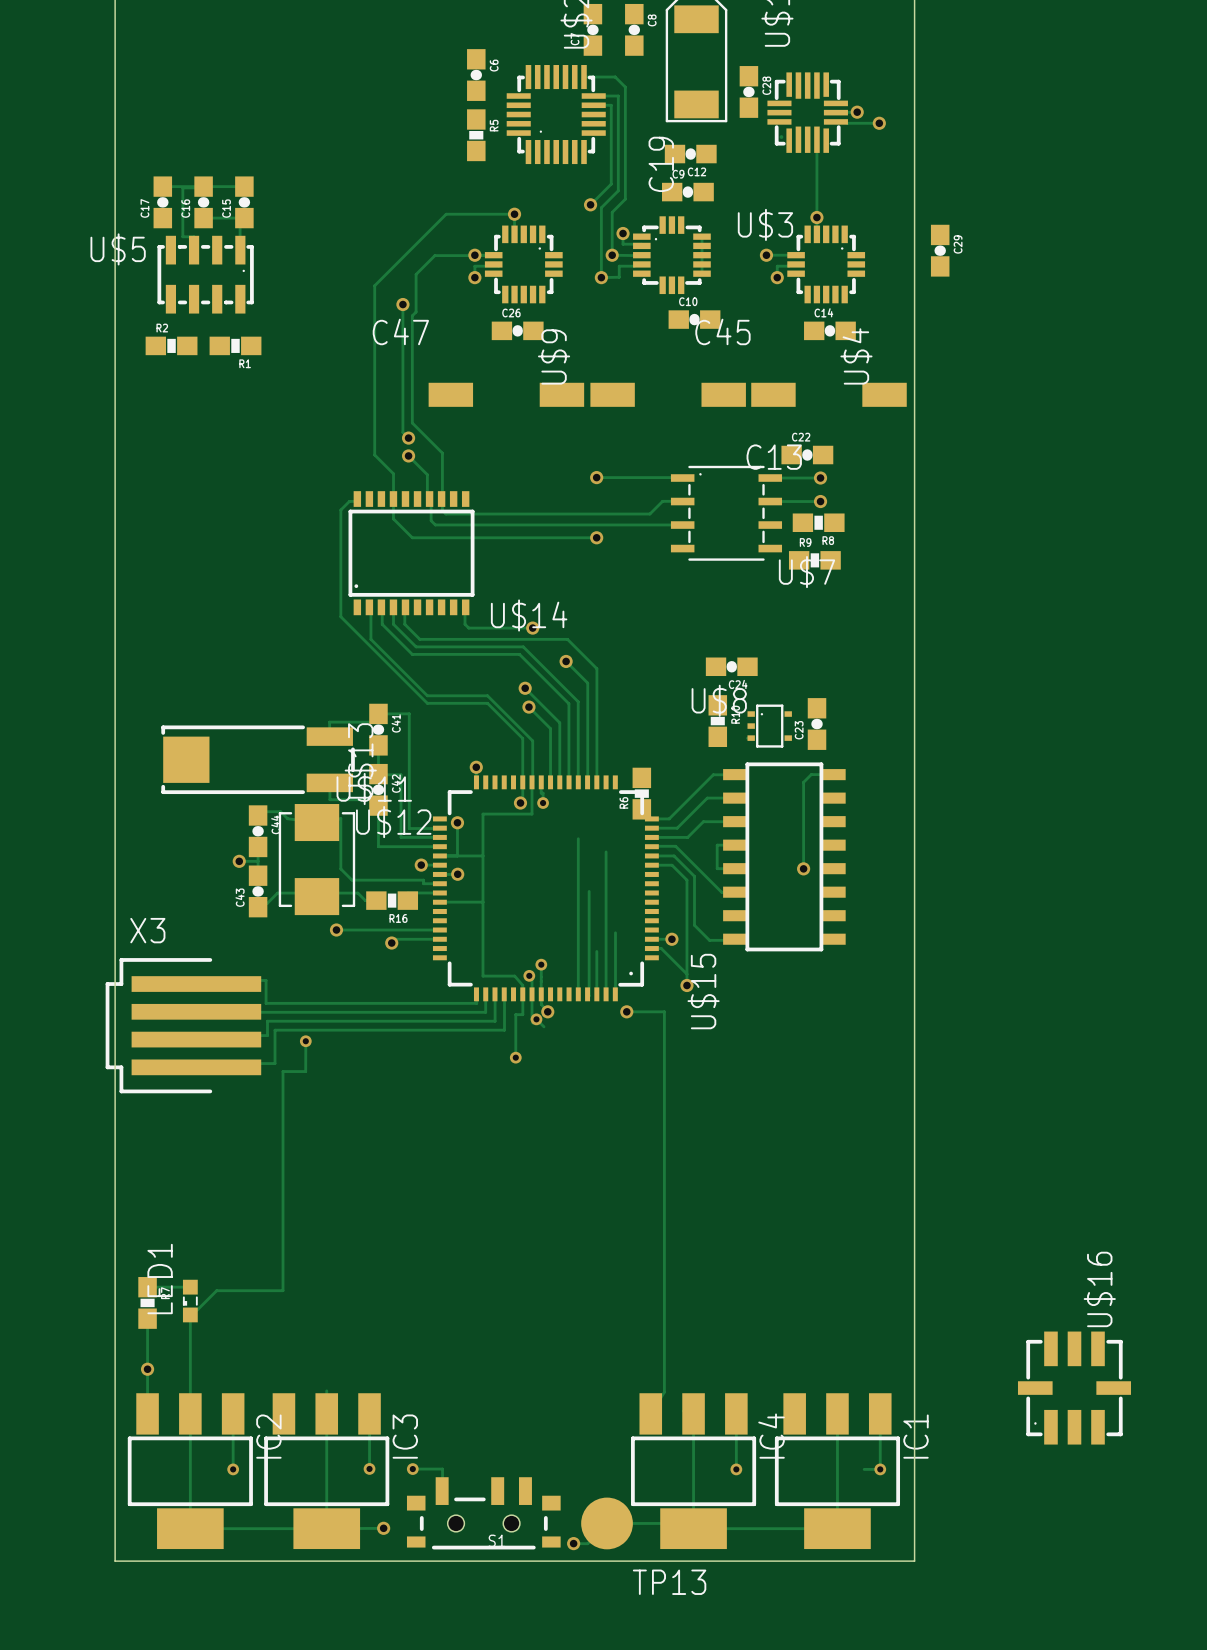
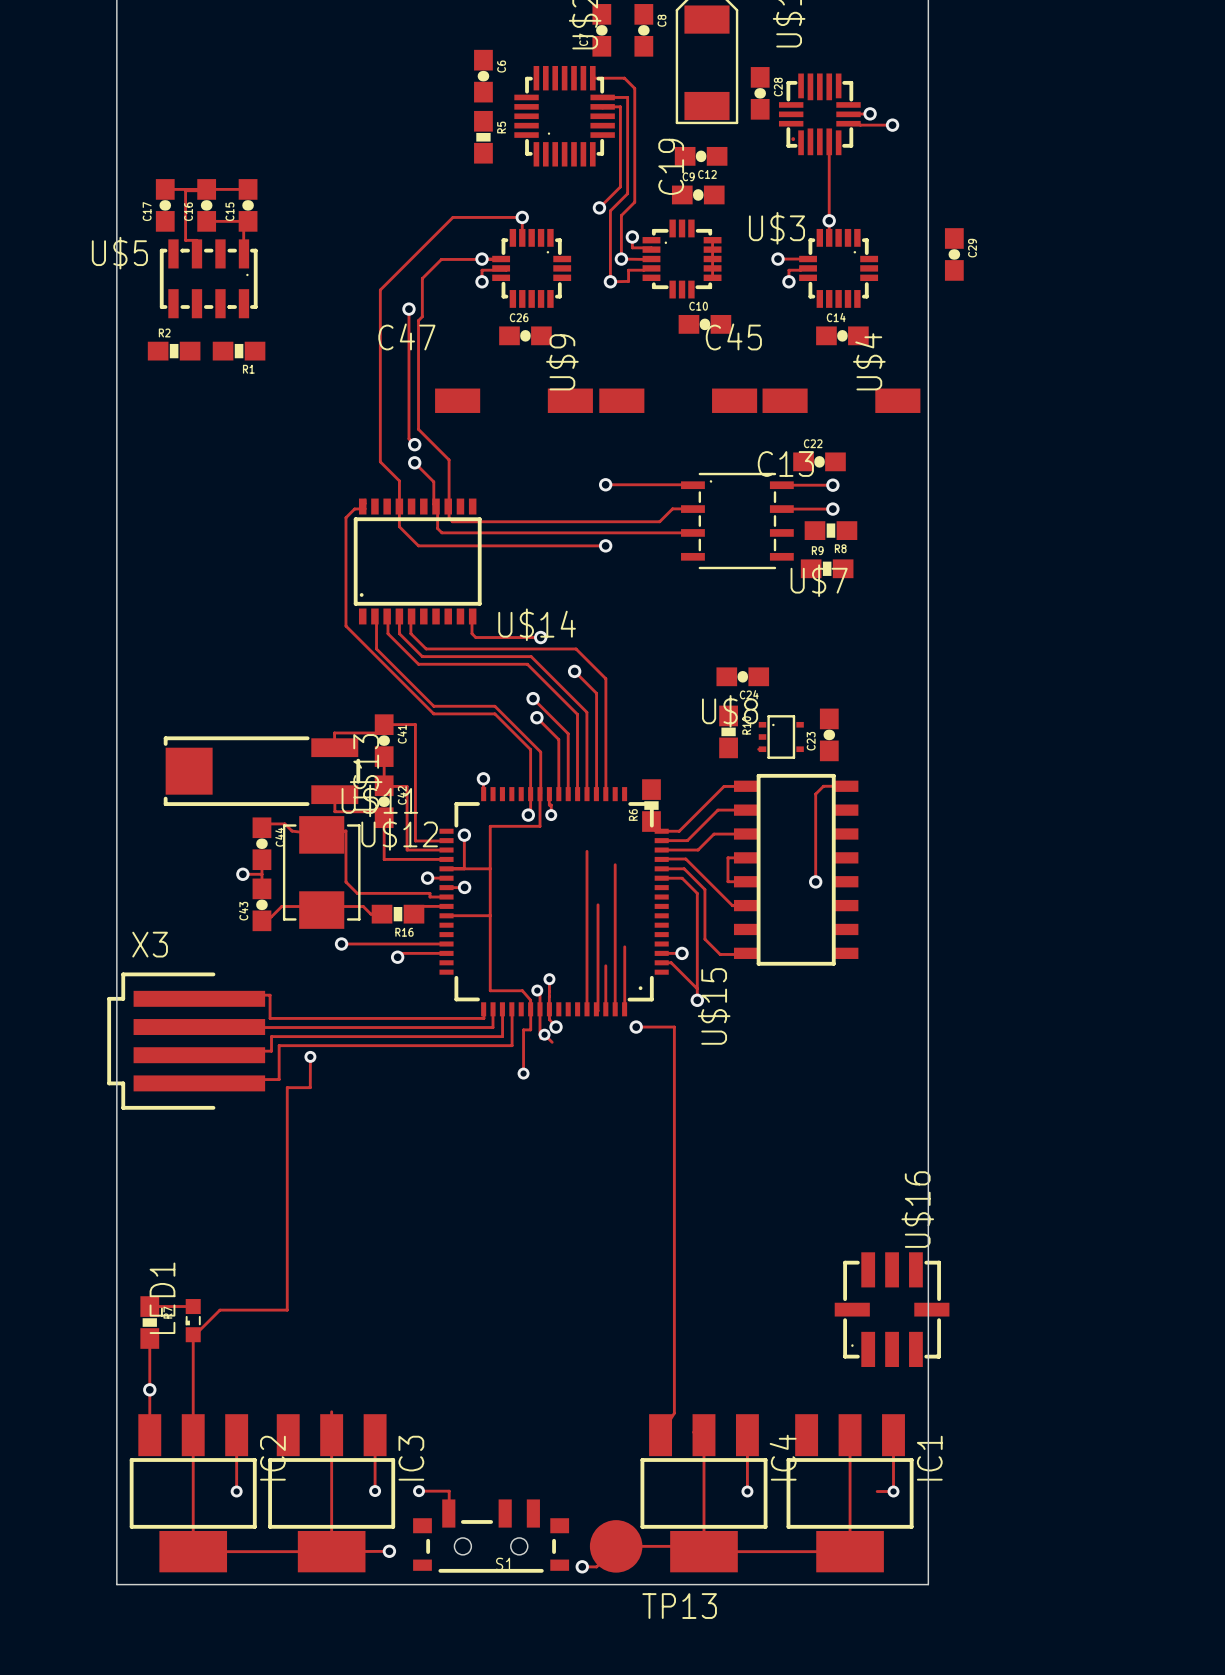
U$16 position: (1074, 1388) -> (892, 1309)

